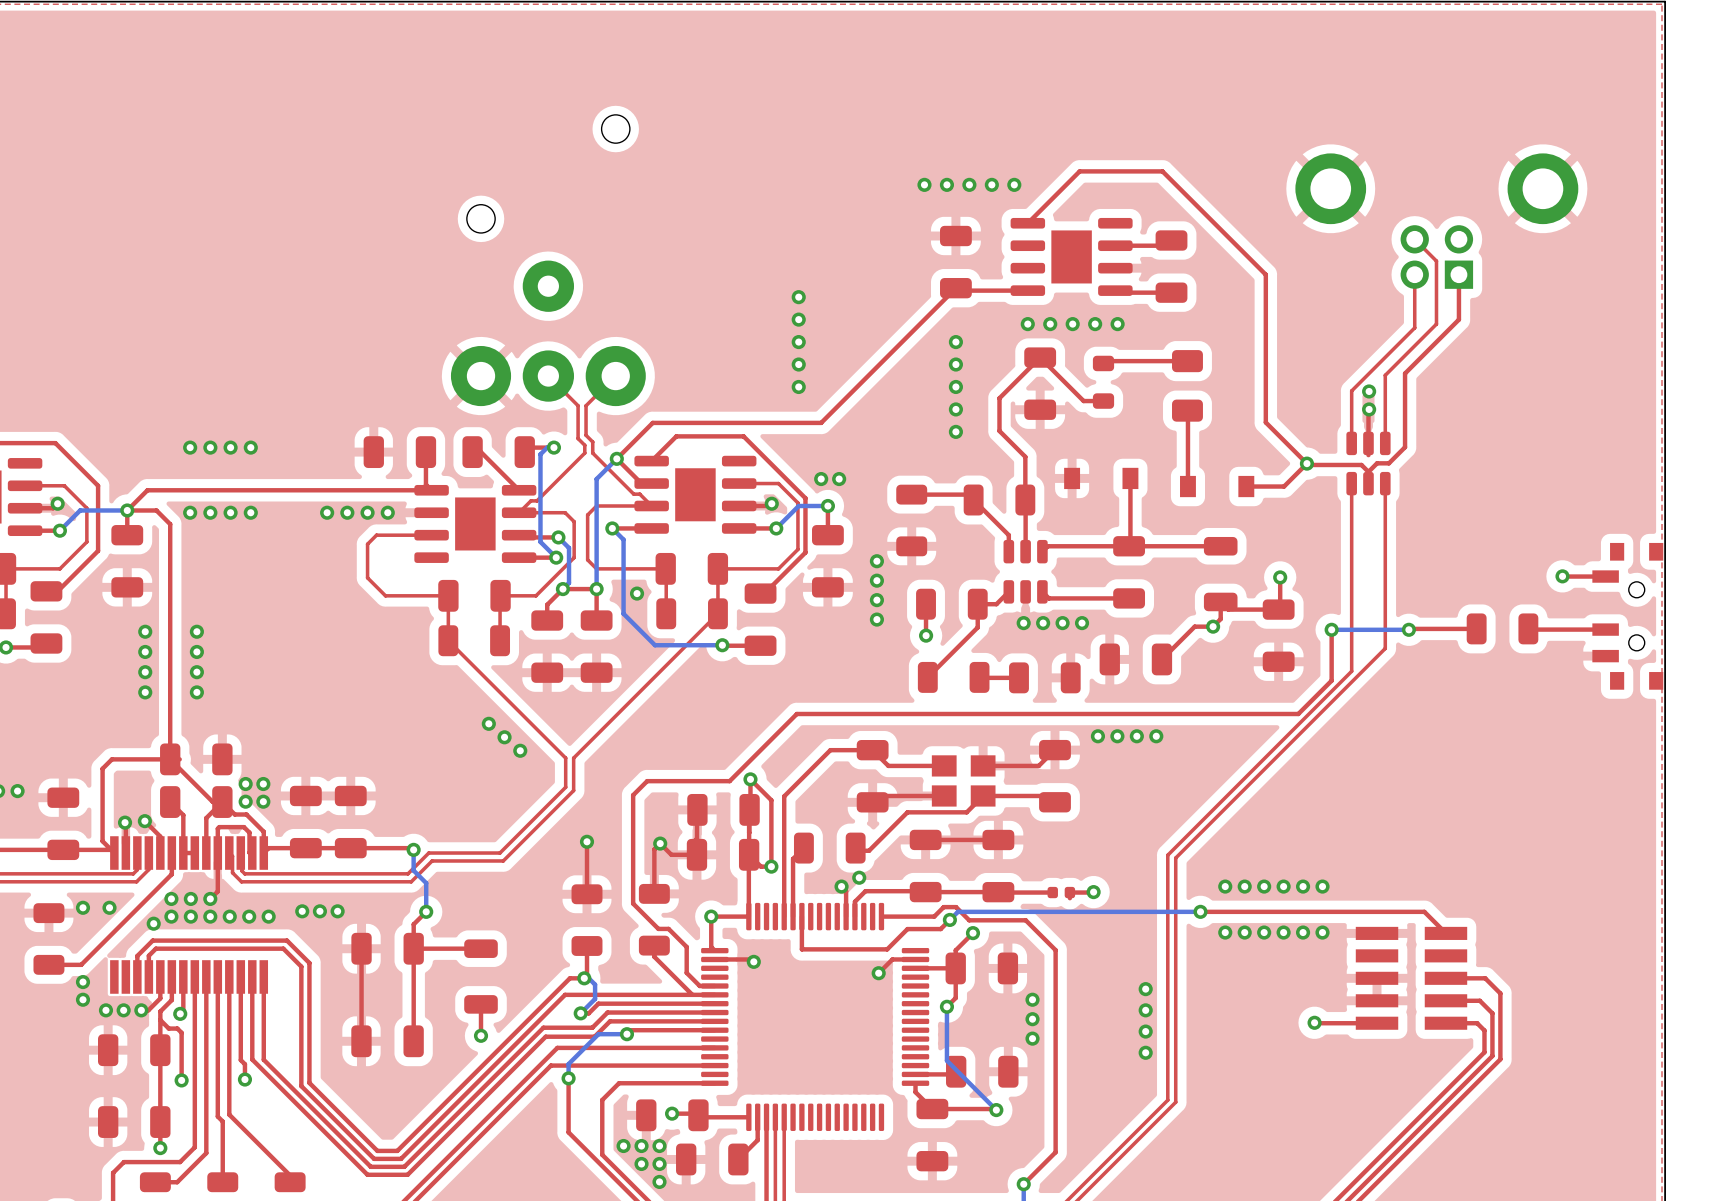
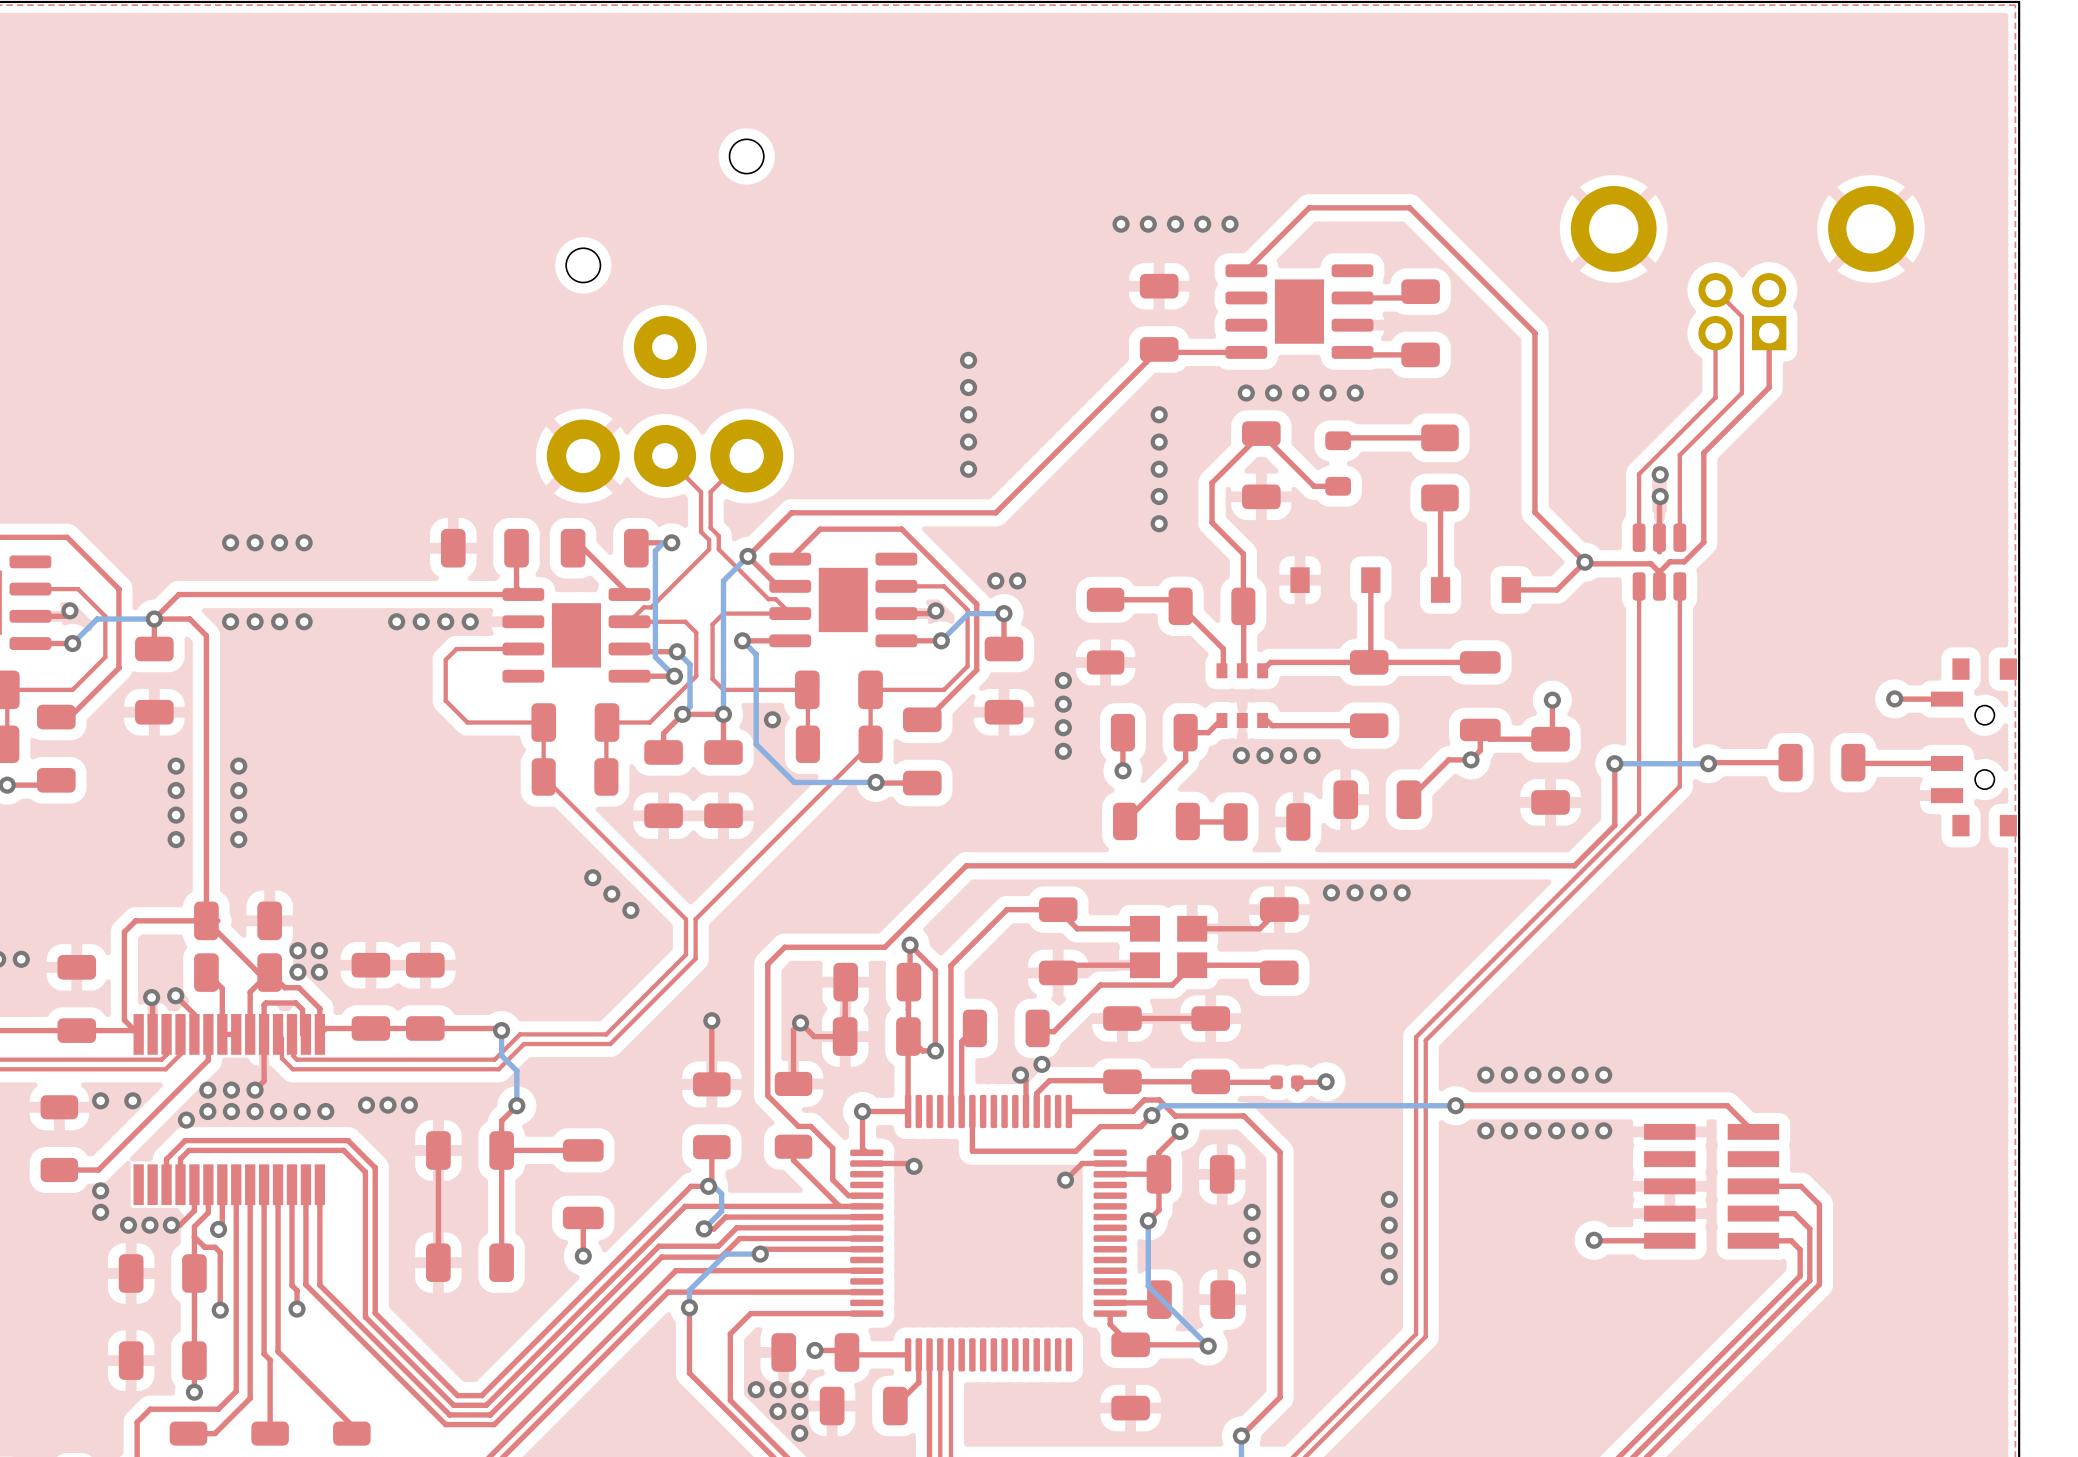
part footprint: [1003, 539, 1048, 604] -> [1216, 663, 1269, 729]

